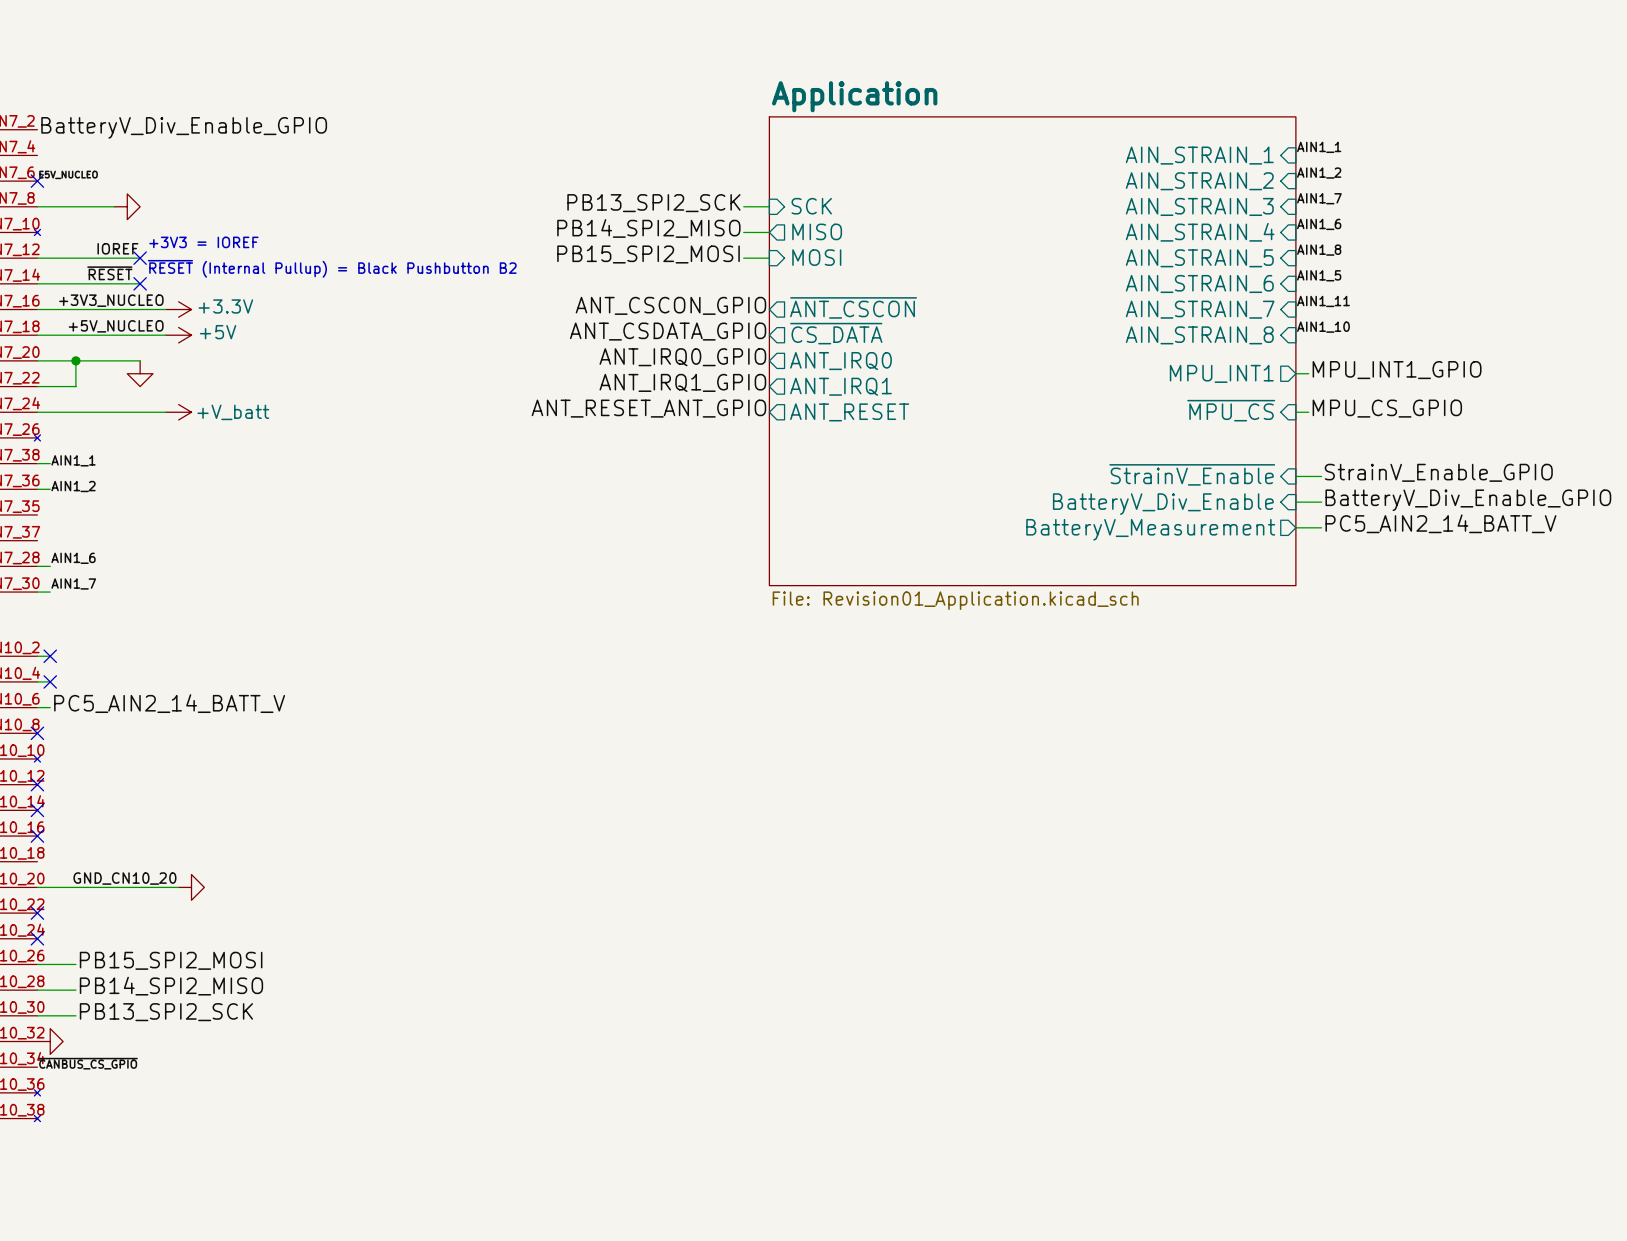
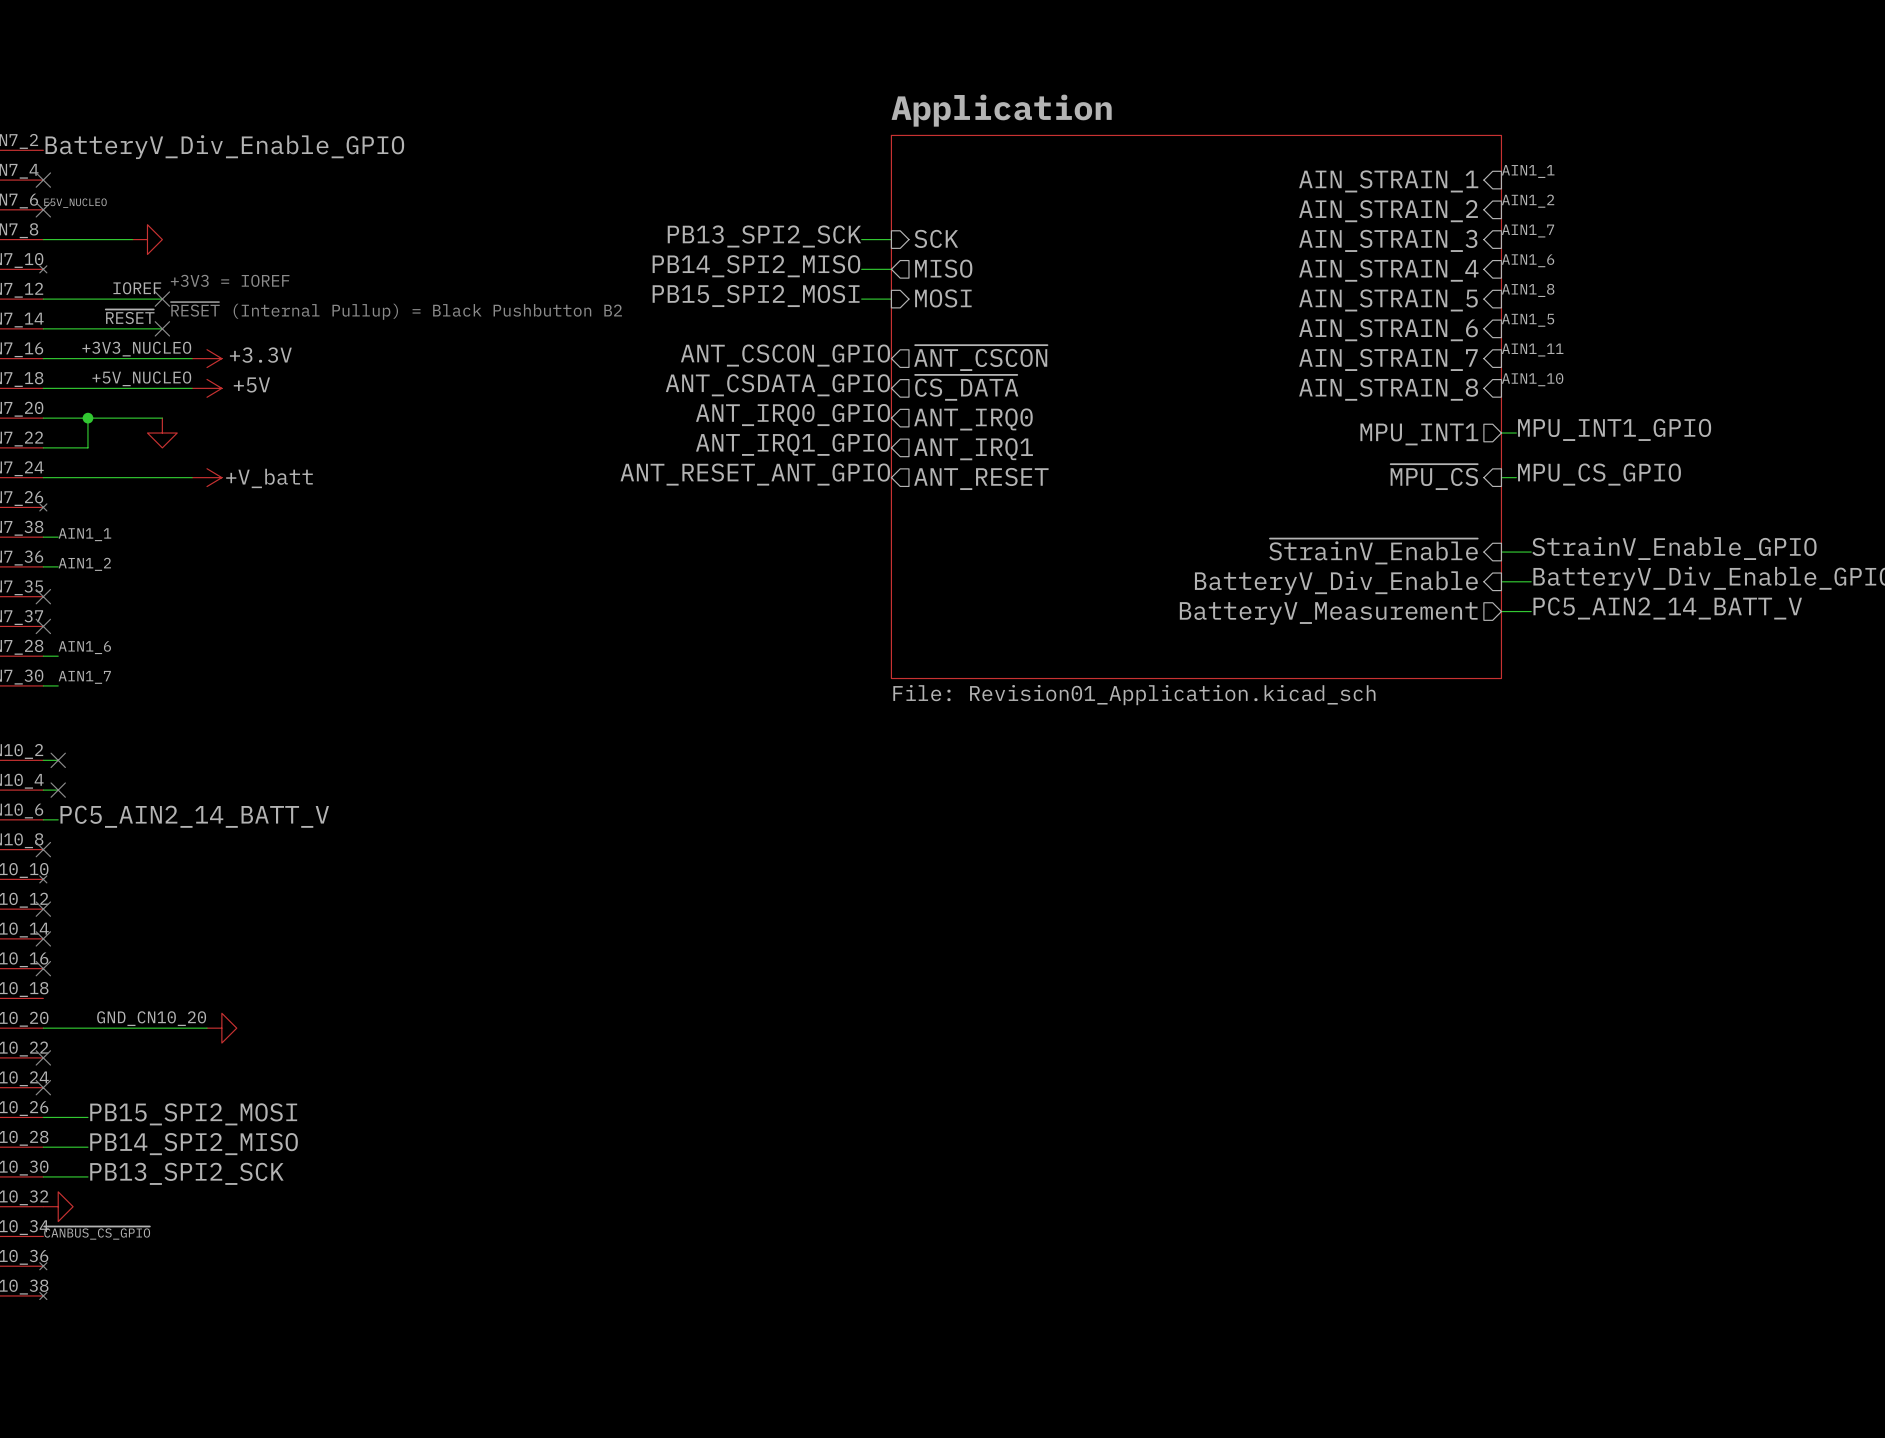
no-connect mark: none -> (43, 180)
no-connect mark: none -> (43, 596)
no-connect mark: none -> (43, 626)

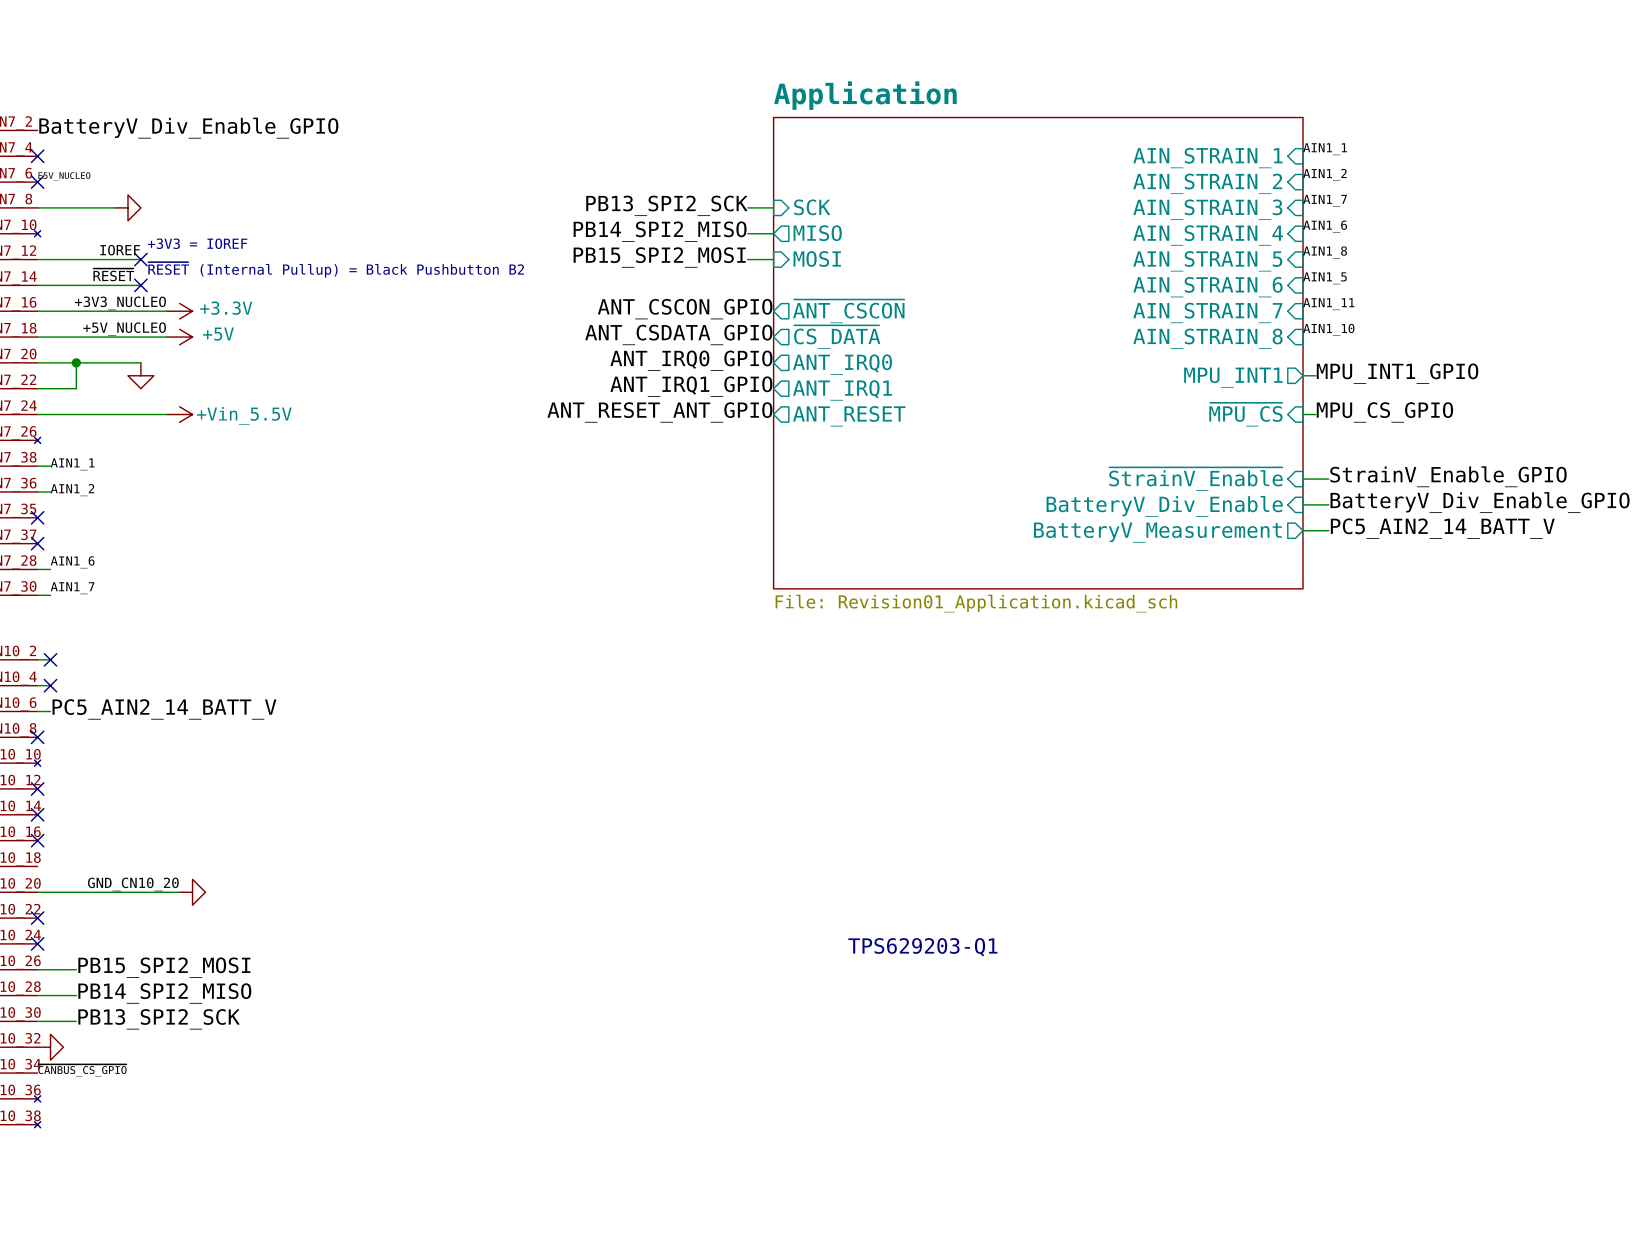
power symbol: +V_batt (207, 477) -> +Vin_5.5V (179, 414)
text: none -> TPS629203-Q1 (922, 947)

